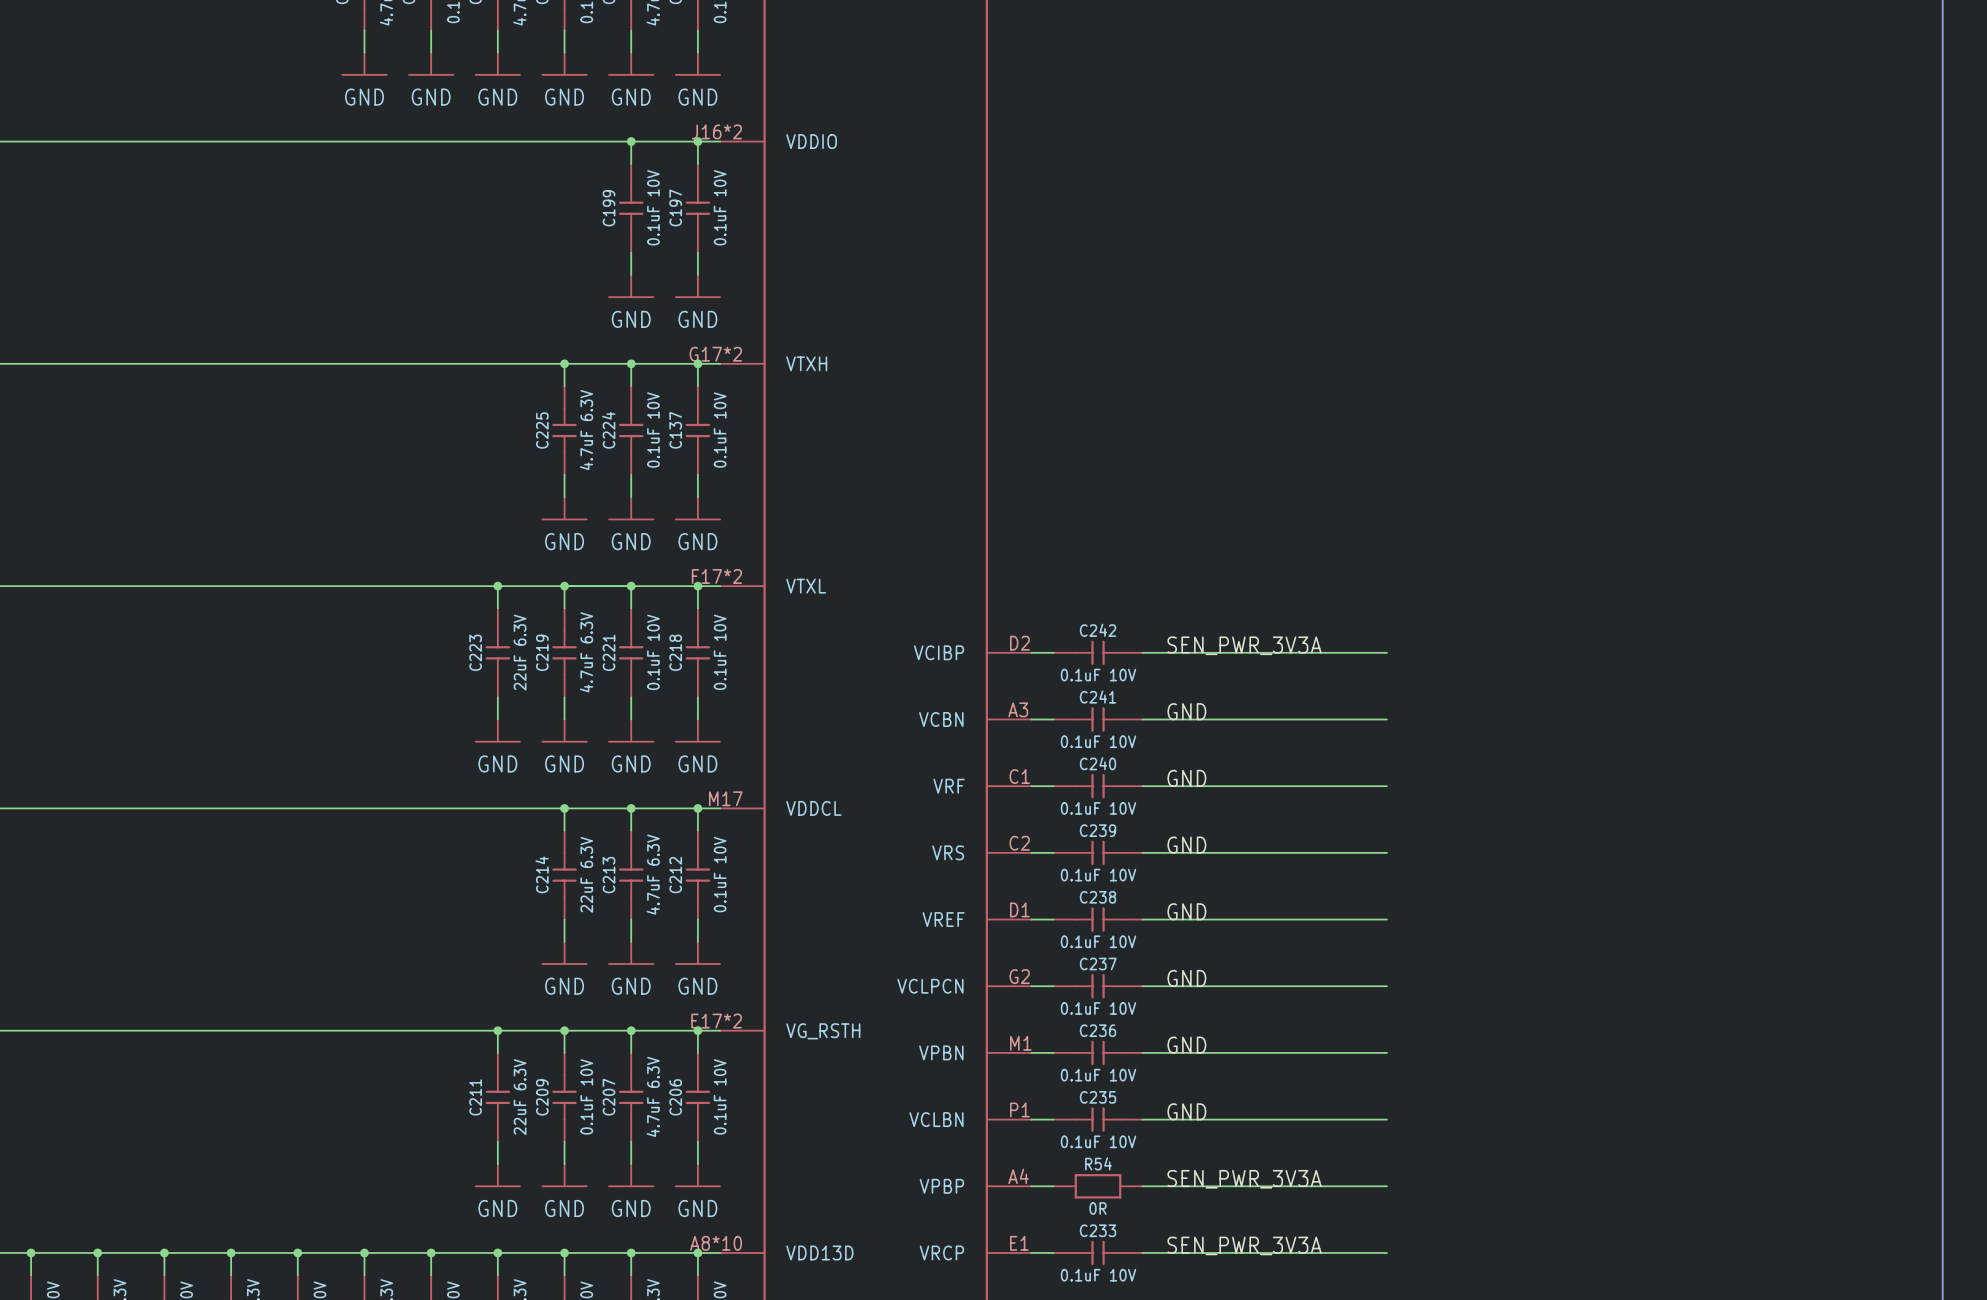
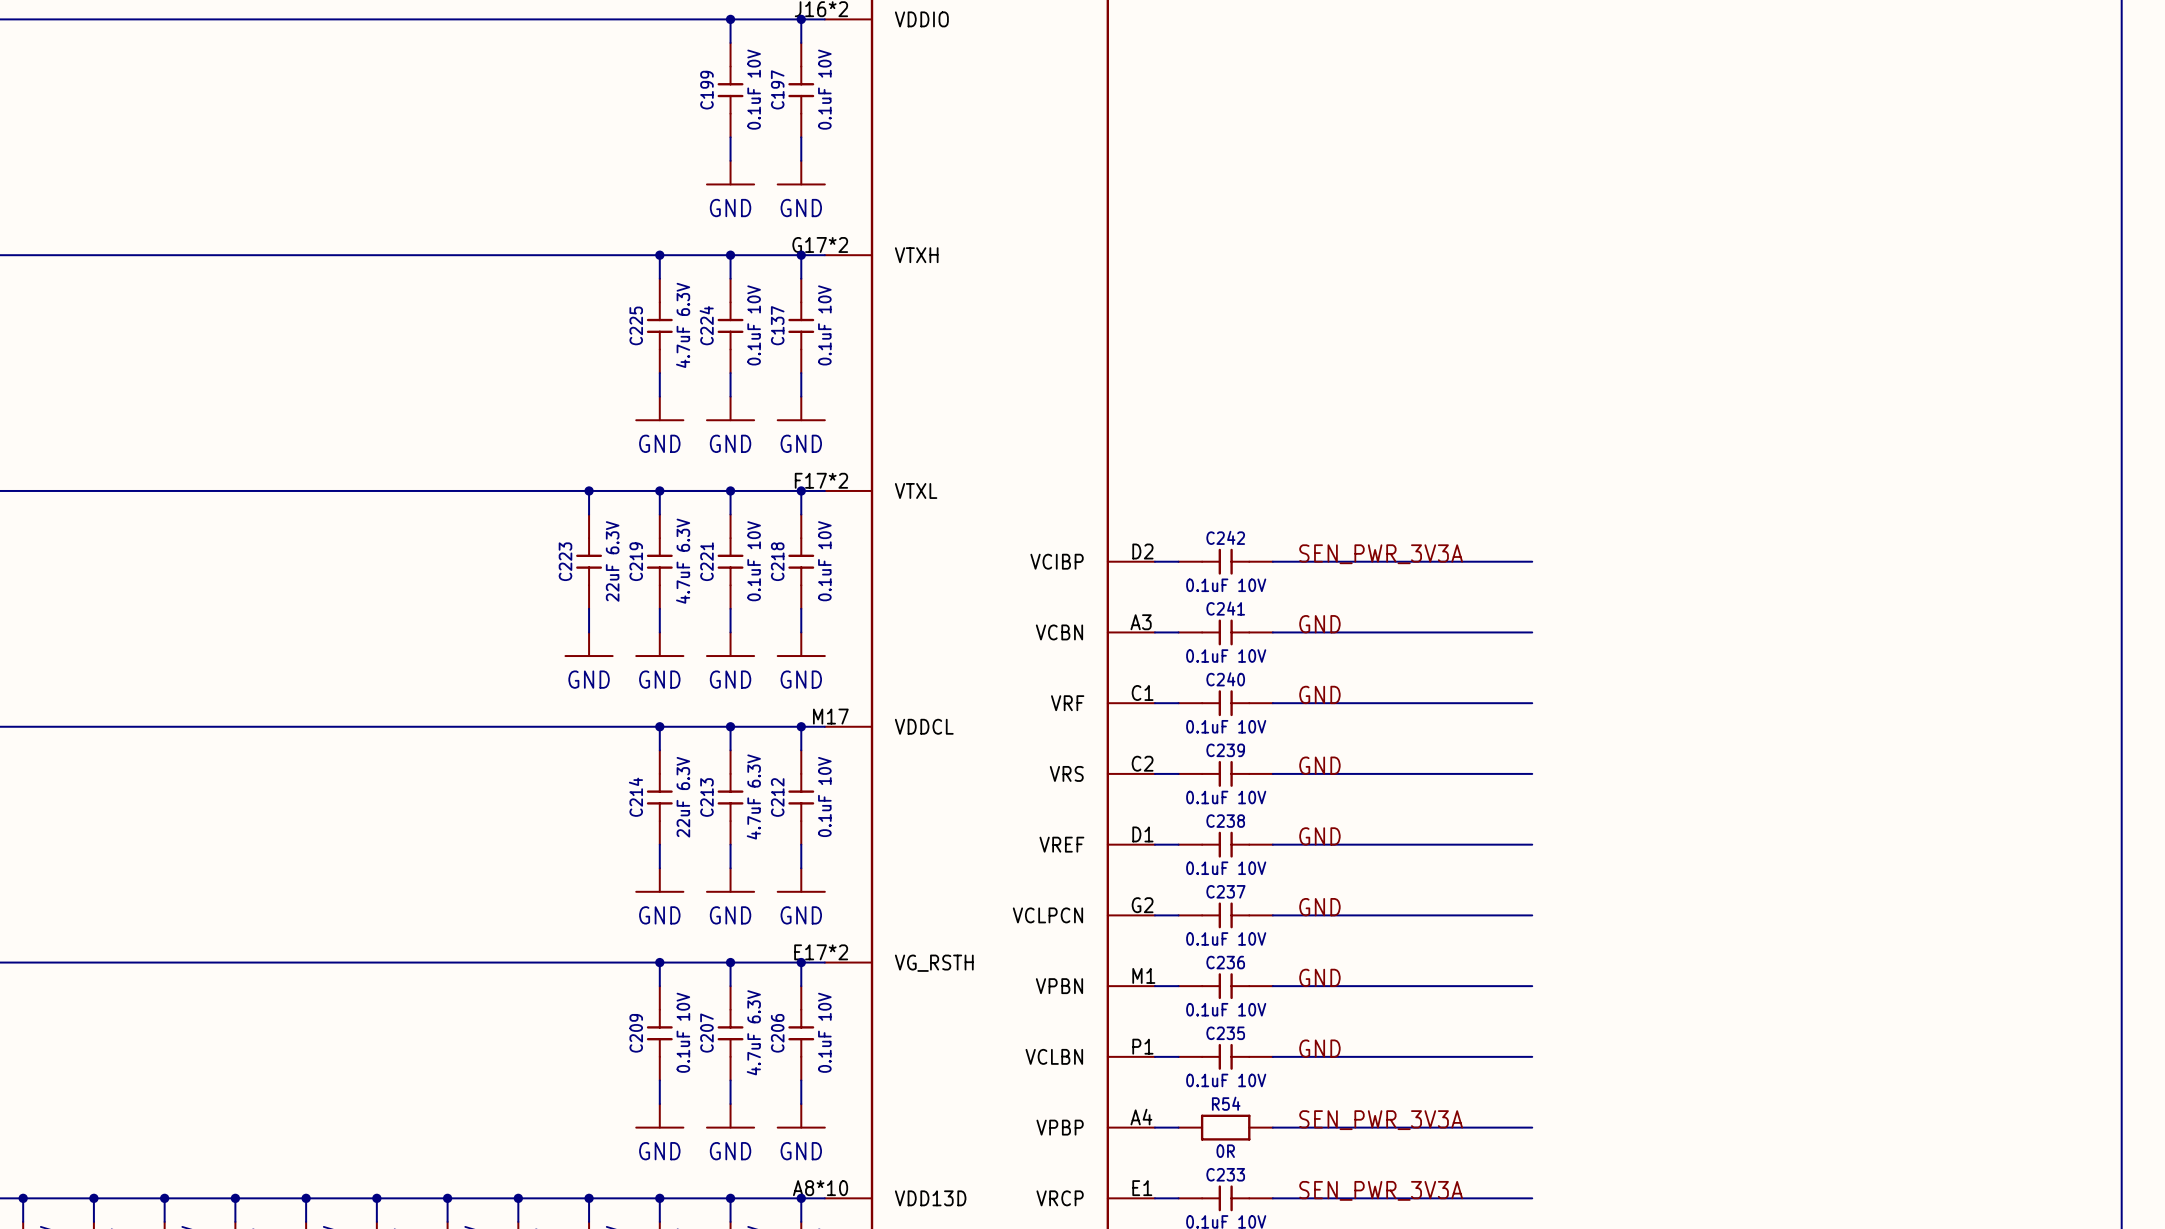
wire: (497, 1030) (497, 1052) -> none
junction: (497, 1030) -> none
C211: 22uF 6.3V (497, 1097) -> none
wire: (497, 1141) (497, 1164) -> none
power symbol: GND (497, 1175) -> none

